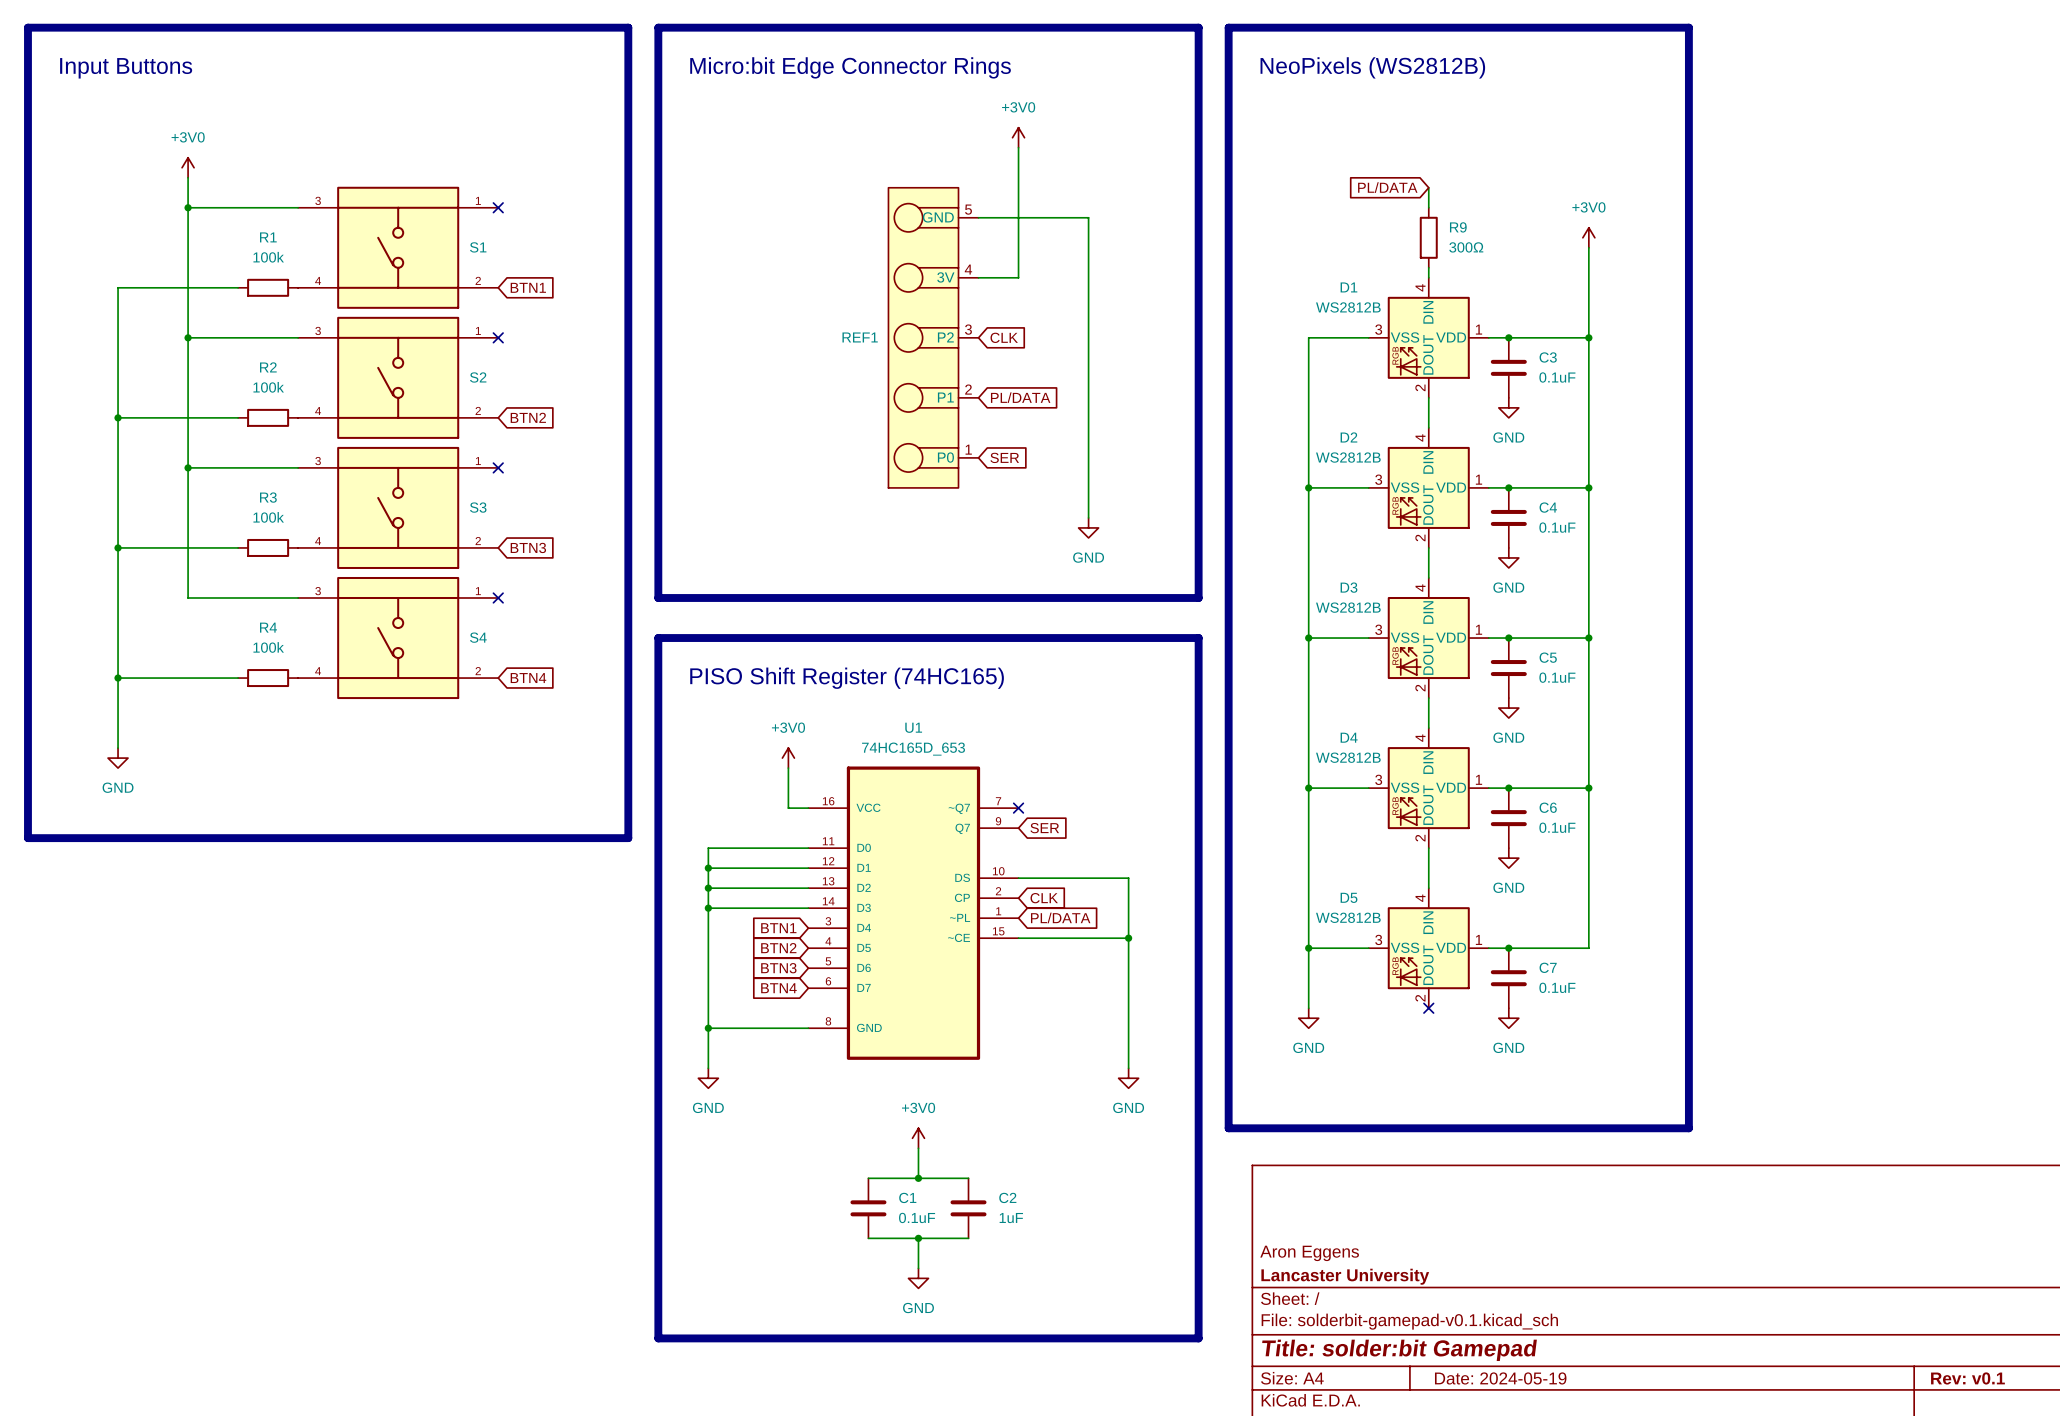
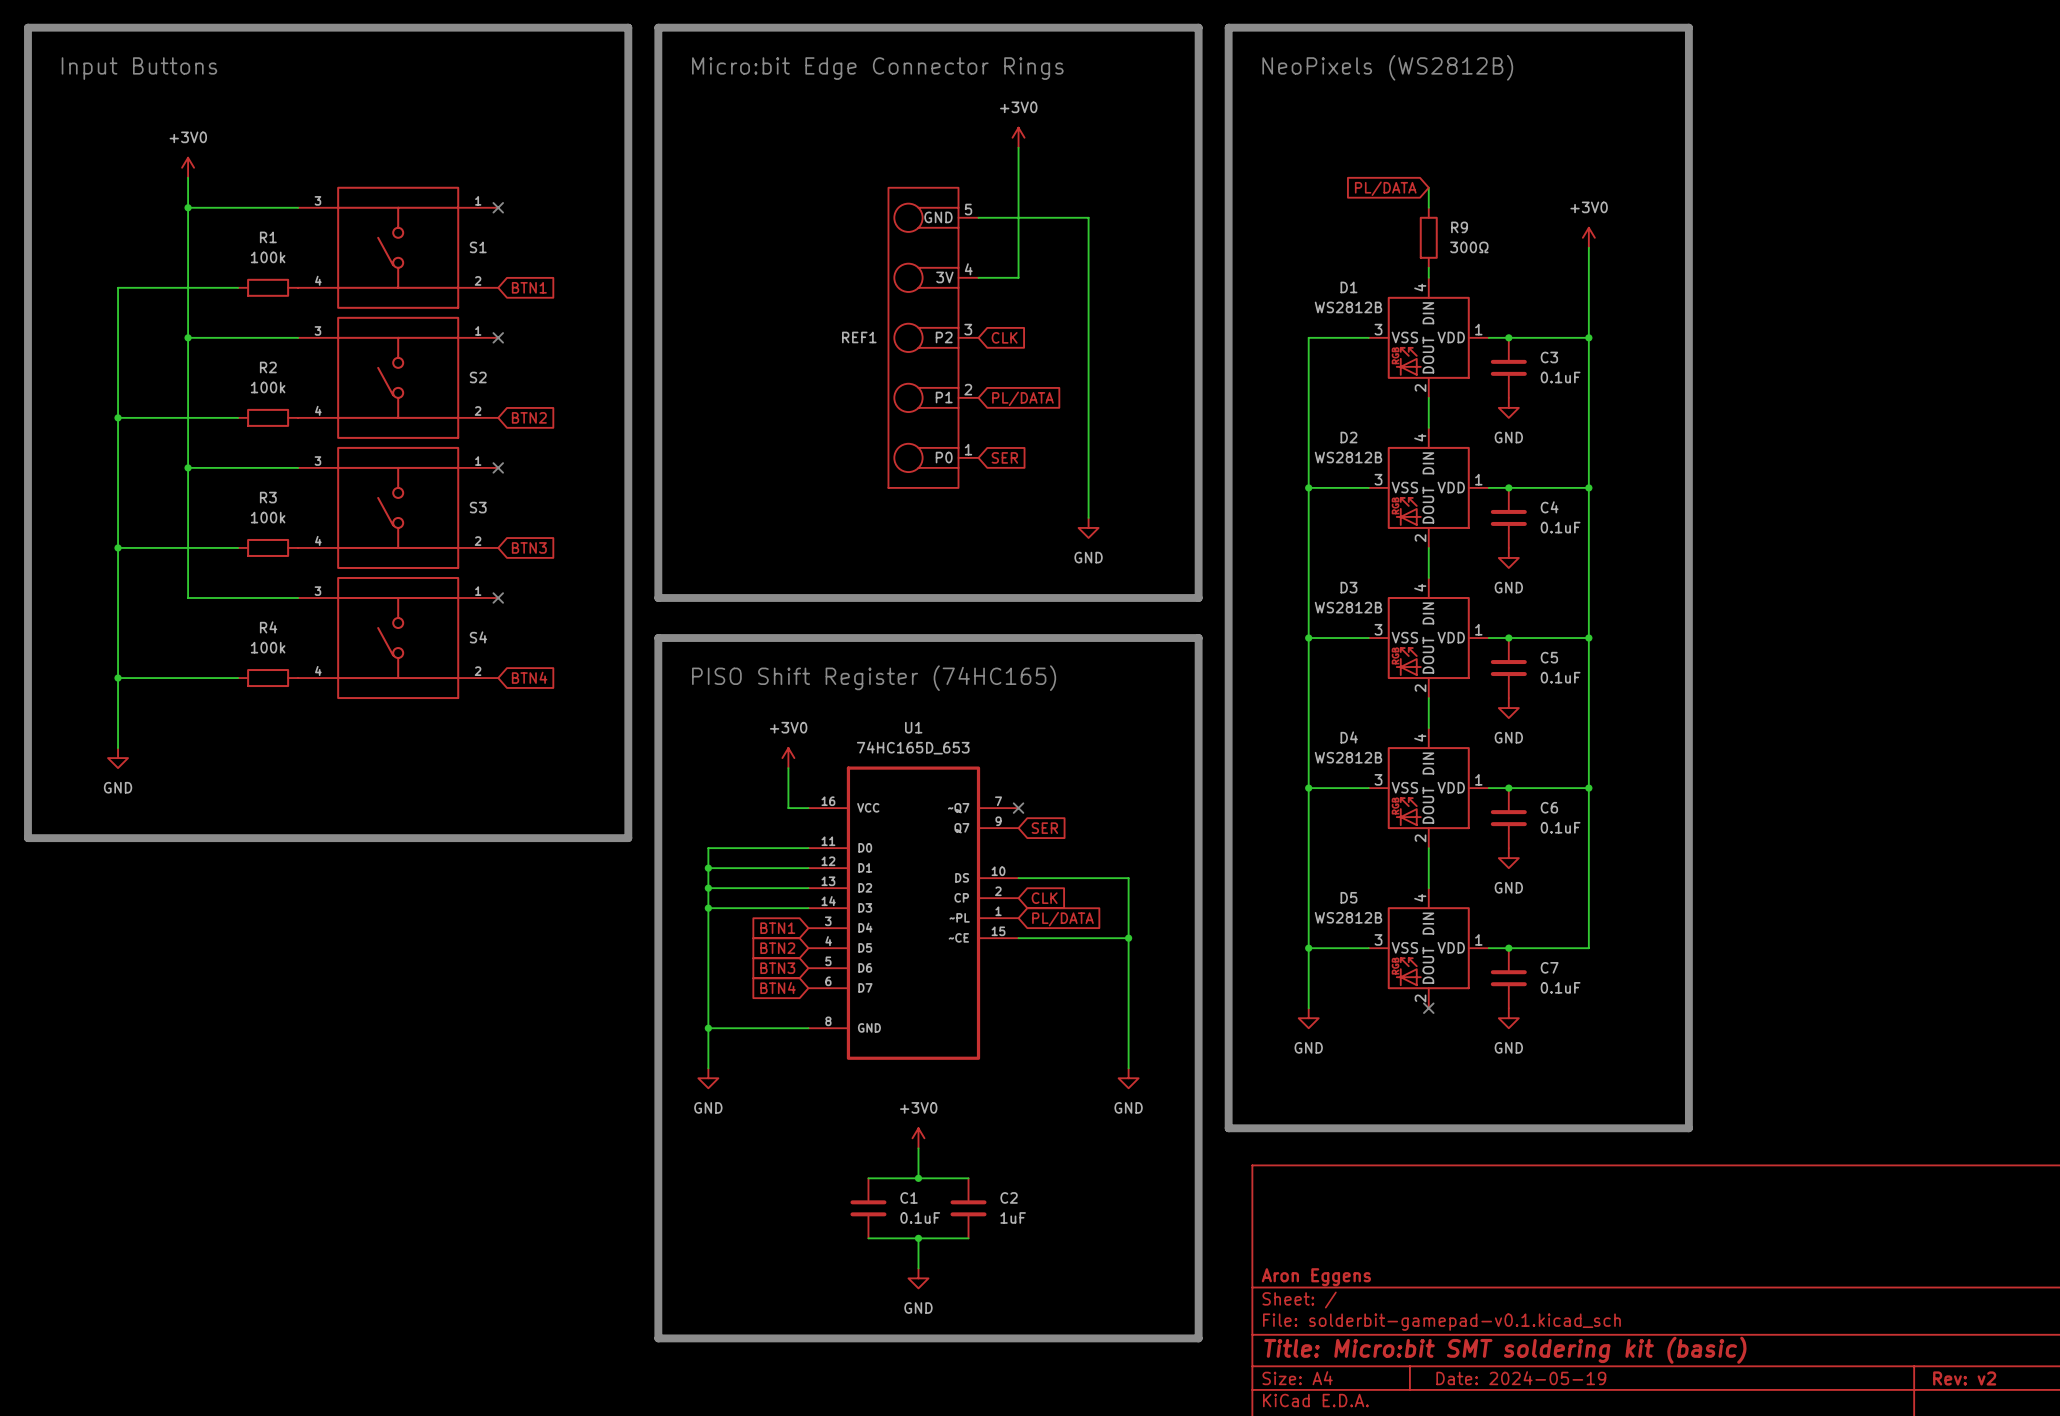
title block: Aron Eggens (1309, 1253) -> none
title block: Lancaster University (1345, 1276) -> Aron Eggens (1316, 1277)
title block: Title: solder:bit Gamepad (1399, 1350) -> Title: Micro:bit SMT soldering kit (basic) (1505, 1350)
title block: Rev: v0.1 (1967, 1378) -> Rev: v2 (1964, 1378)

